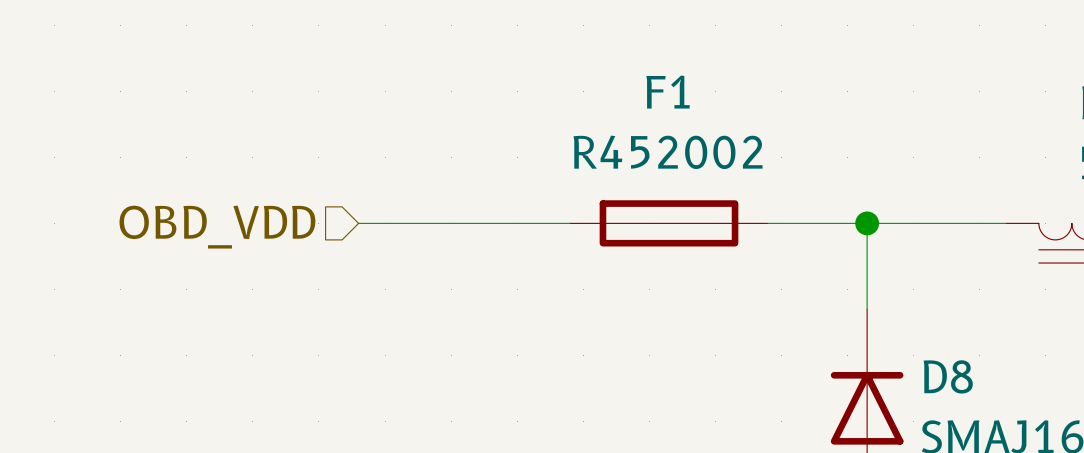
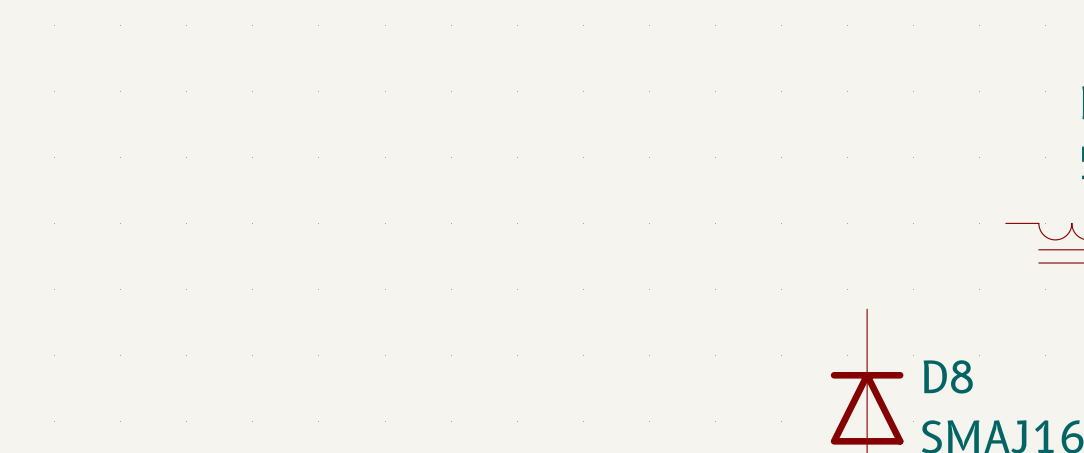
wire: (358, 223) (569, 223) -> none
F1: R452002 (669, 223) -> none
wire: (768, 223) (1005, 223) -> none
wire: (867, 223) (867, 309) -> none
junction: (867, 223) -> none
hierarchical label: OBD_VDD (217, 227) -> none

